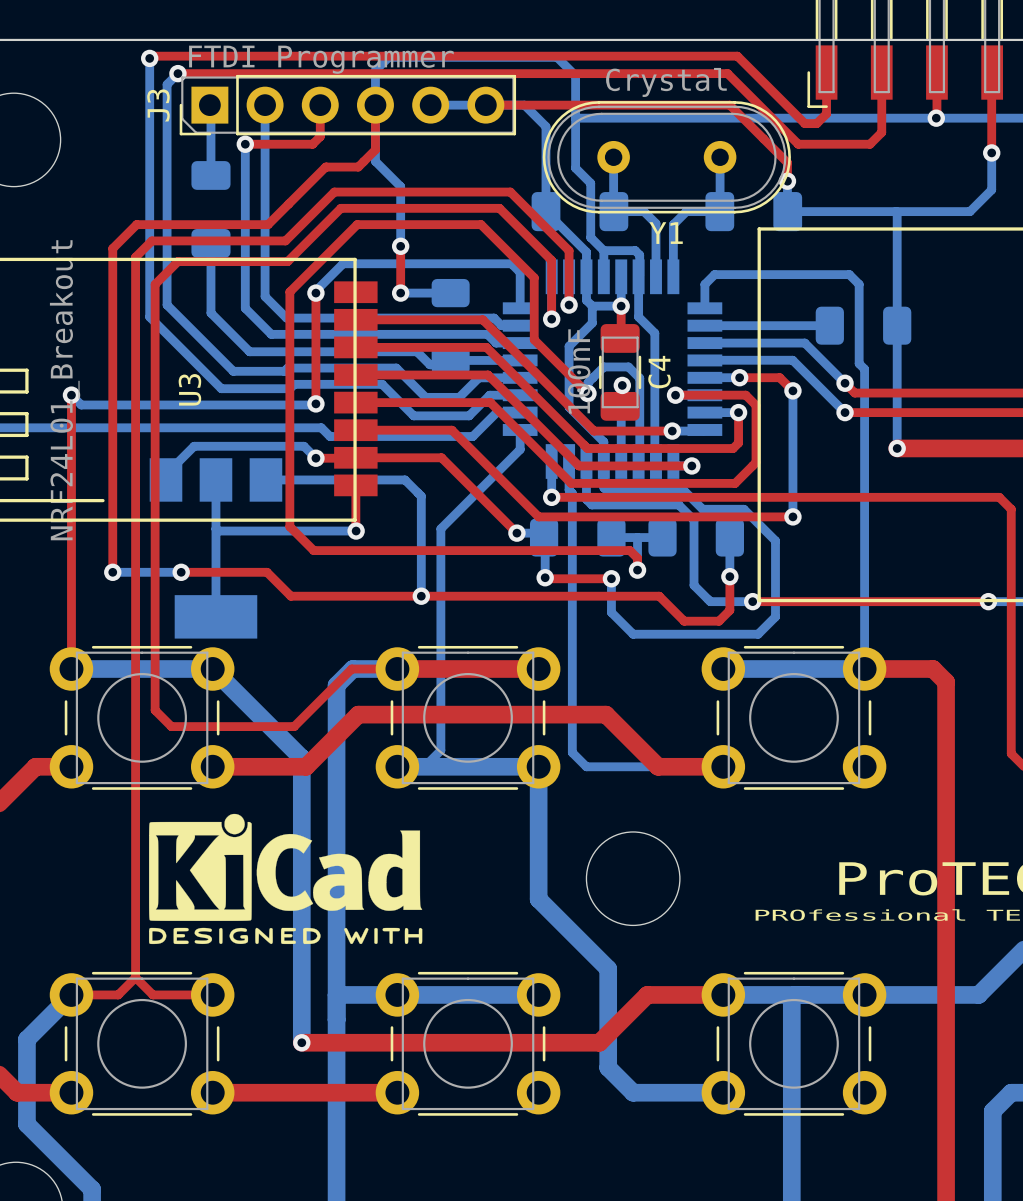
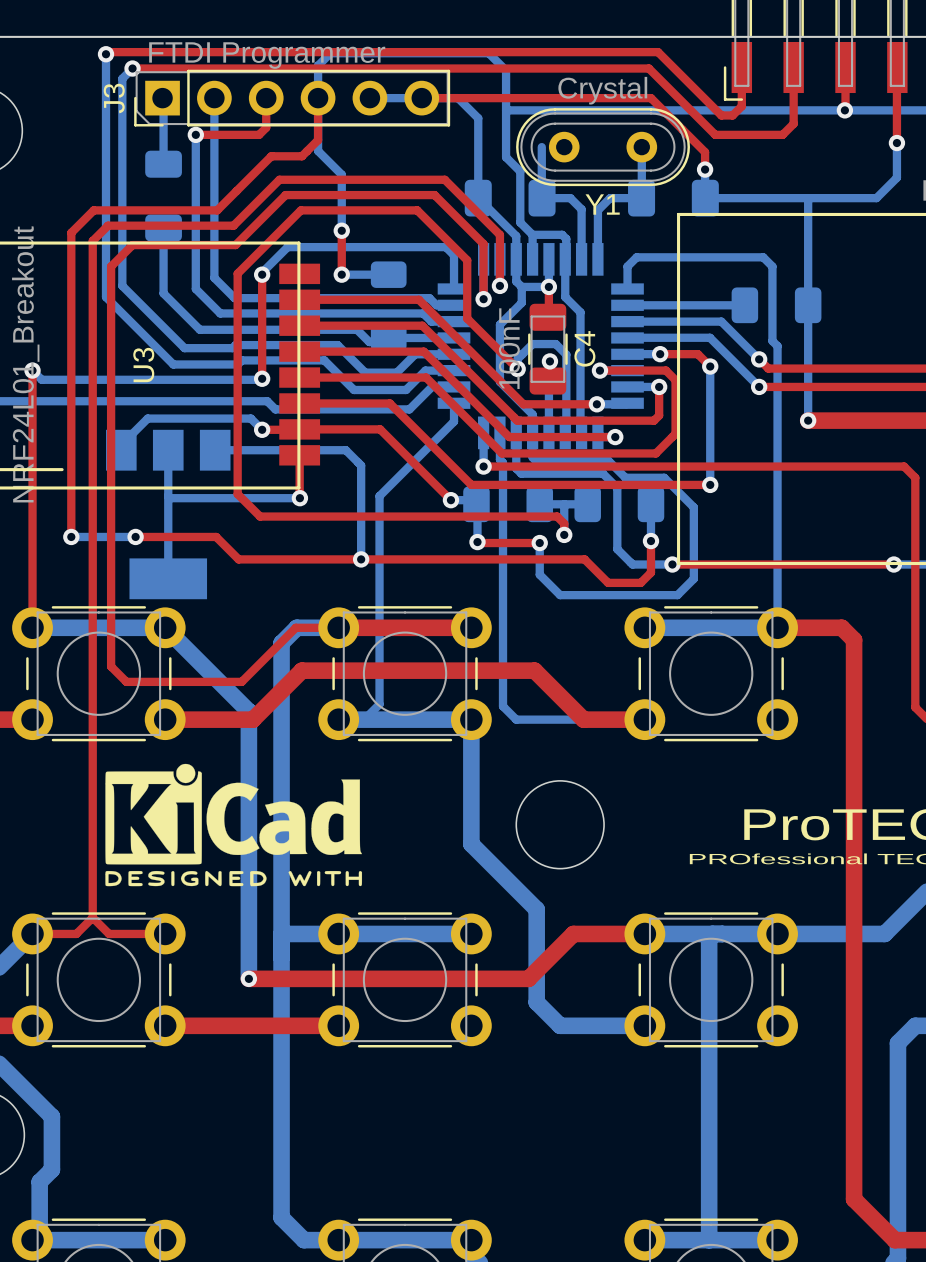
Y1 footprint: [542, 101, 791, 214] -> [516, 108, 690, 187]

